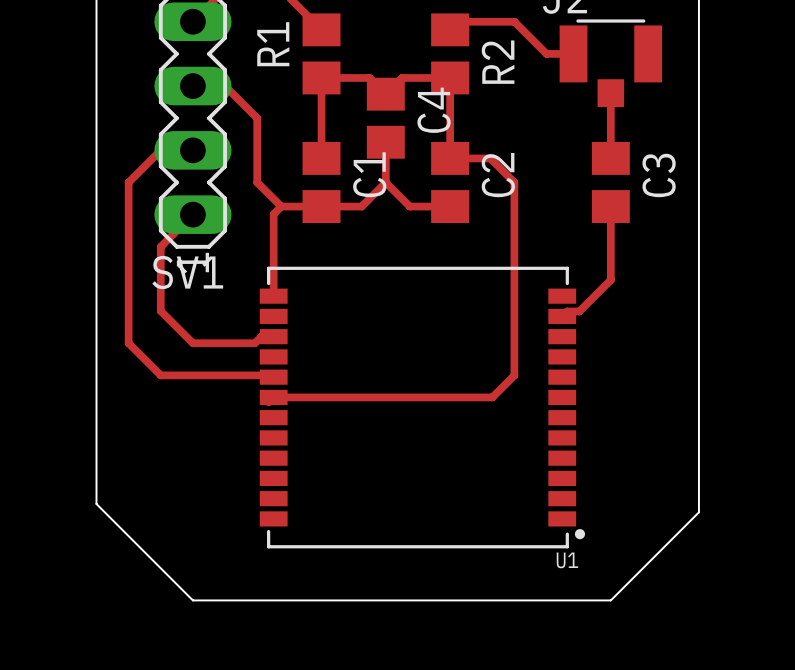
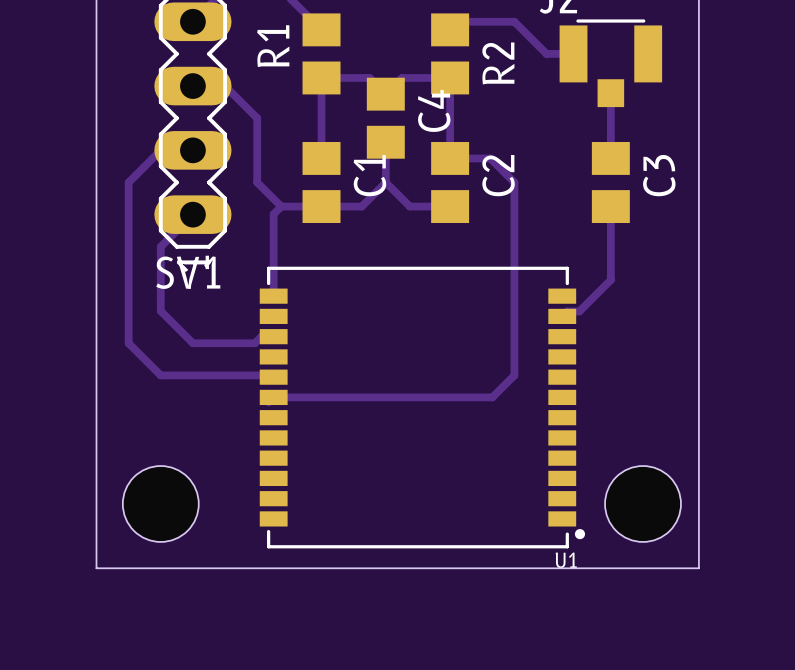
board edge: (96, 503) (192, 600) (610, 600) (698, 512) -> (96, 503) (96, 568) (698, 568) (698, 512)
hole: none -> (160, 503)
hole: none -> (643, 503)

